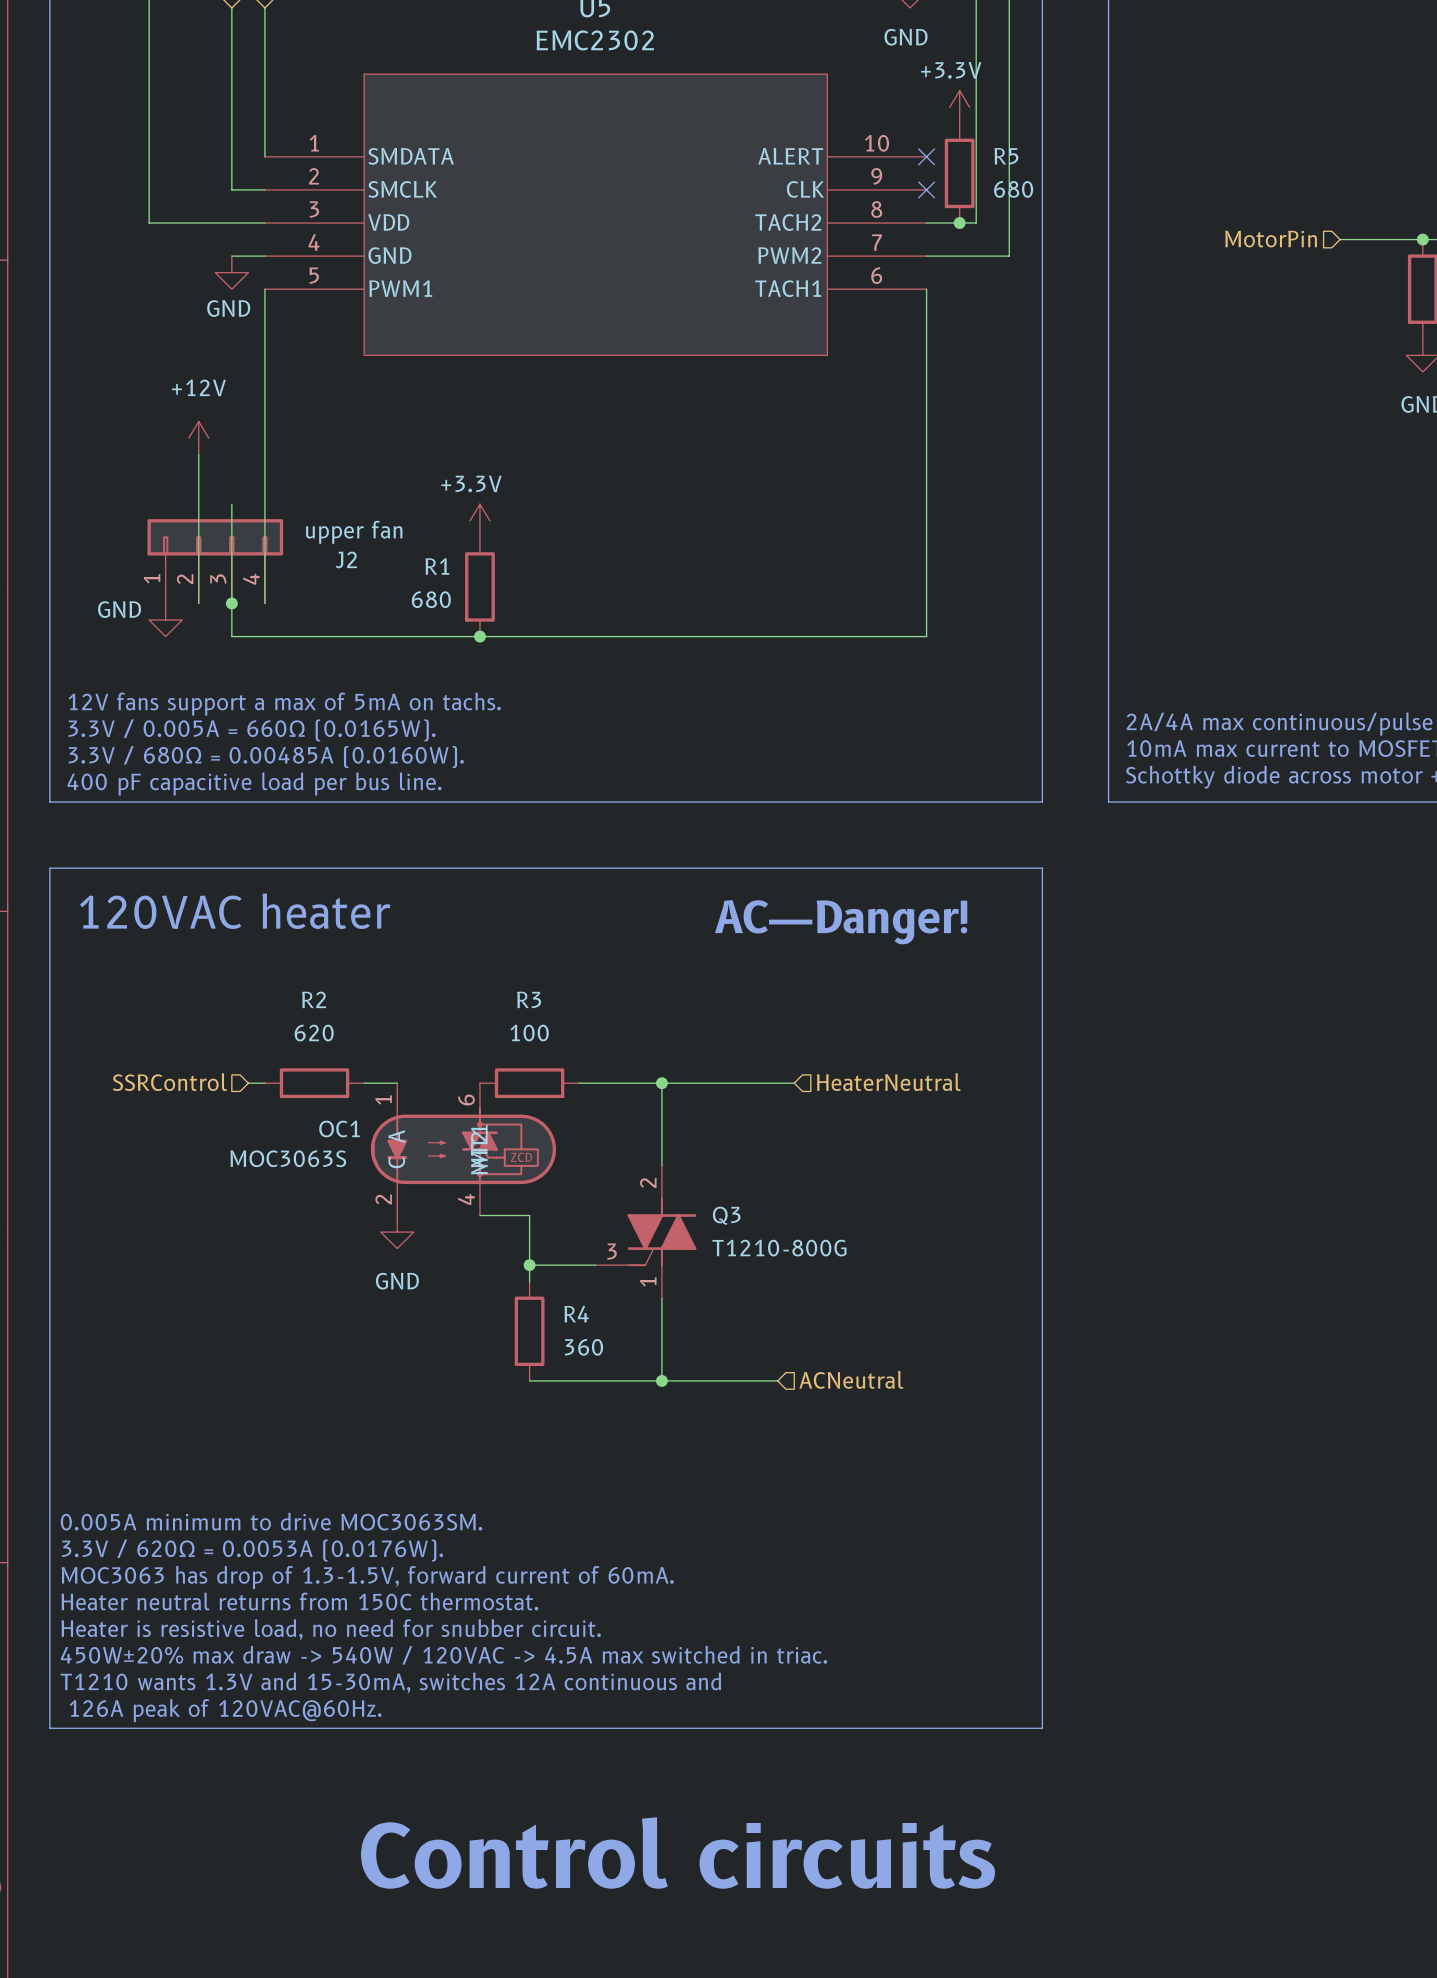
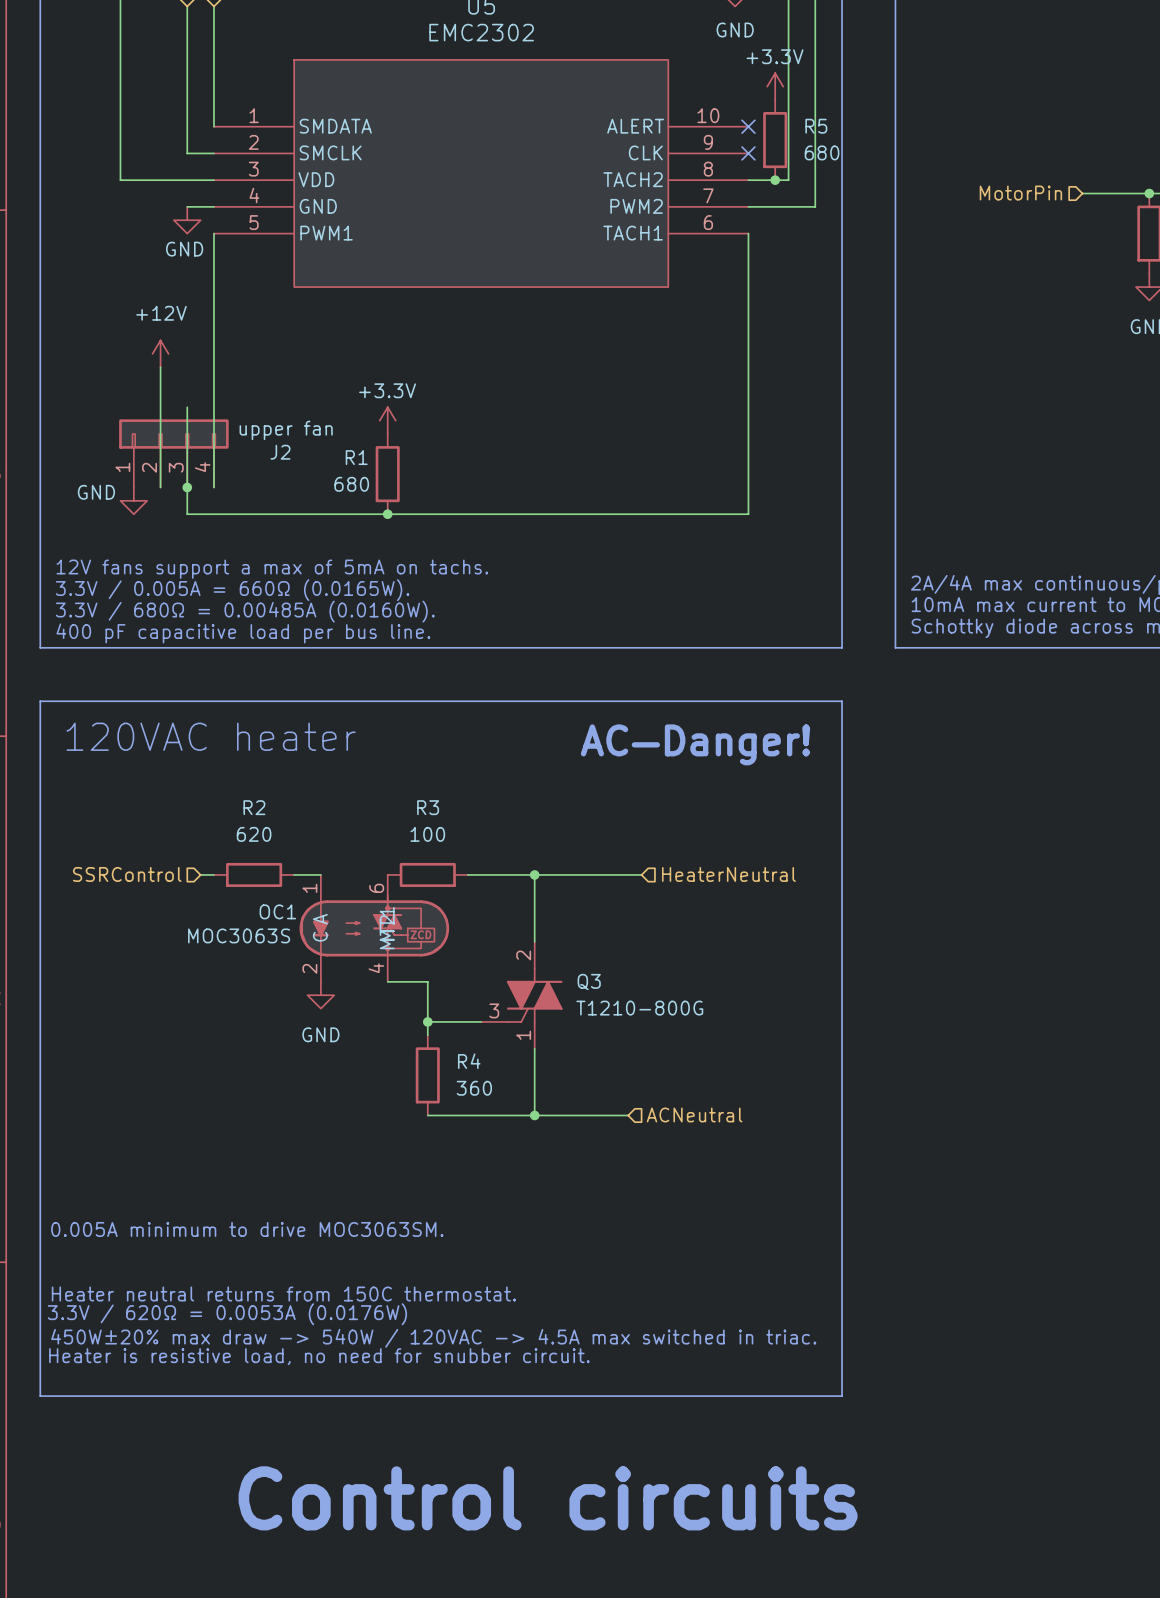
text: 3.3V / 620Ω = 0.0053A (0.0176W). (252, 1550) -> none
text: MOC3063 has drop of 1.3-1.5V, forward current of 60mA. (367, 1577) -> none
text: none -> 3.3V / 620Ω = 0.0053A (0.0176W) (227, 1314)
text position: Heater is resistive load, no need for snubber circuit. (331, 1629) -> Heater is resistive load, no need for snubber circuit. (319, 1356)
text: T1210 wants 1.3V and 15-30mA, switches 12A continuous and (390, 1682) -> none
text: 126A peak of 120VAC@60Hz. (225, 1710) -> none

